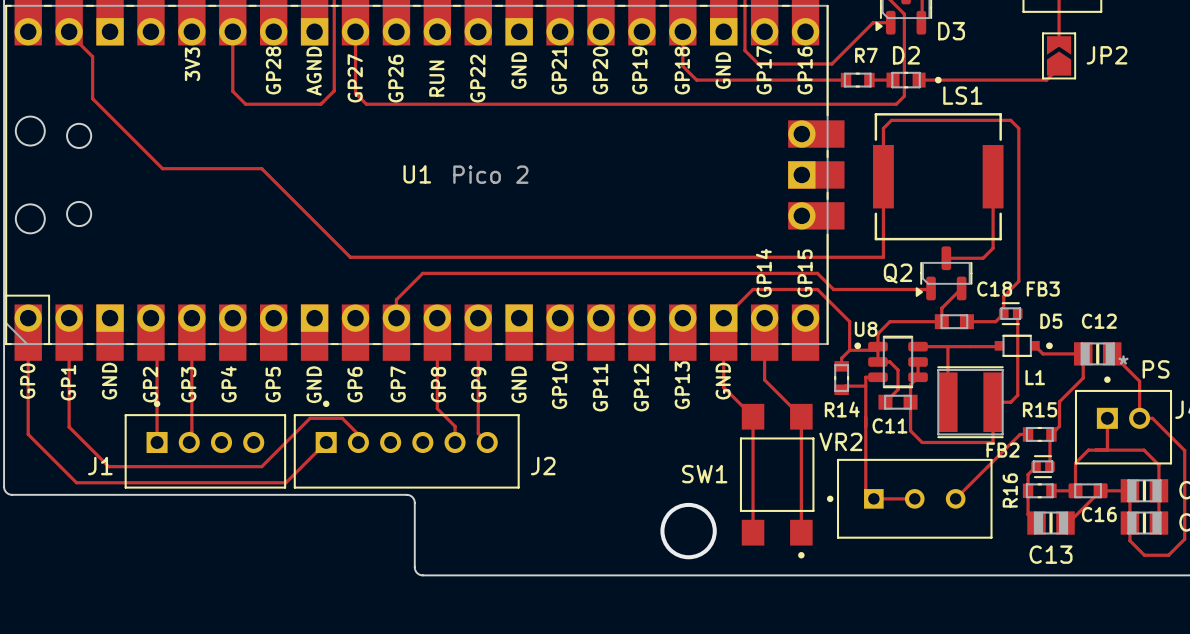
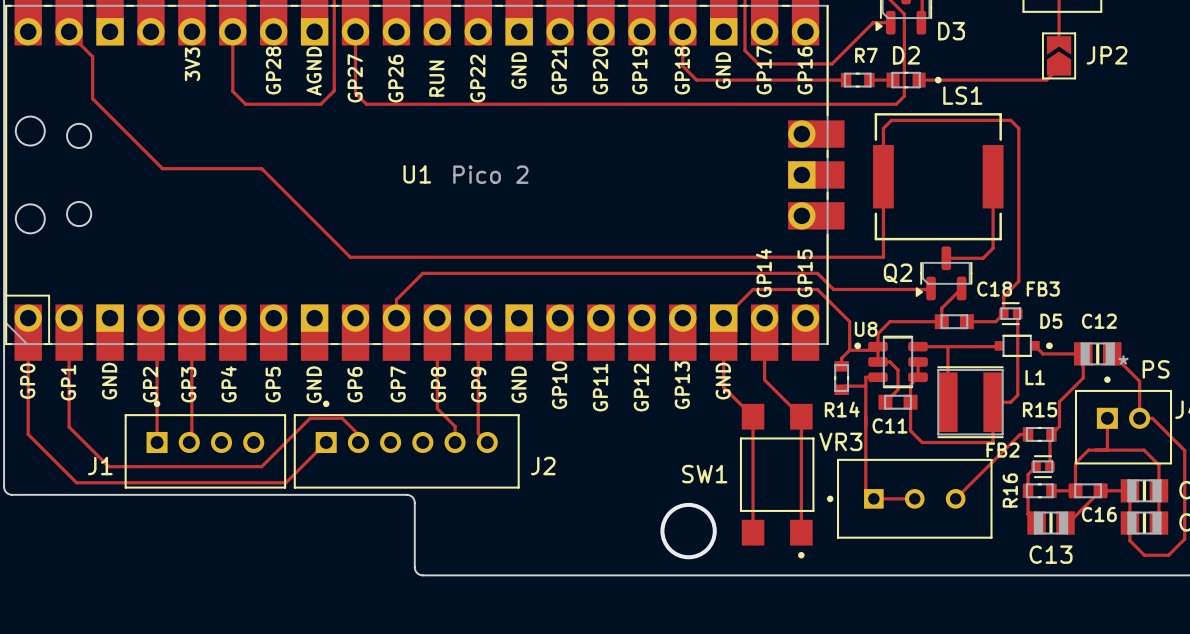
VR2 name: VR2 (840, 441) -> VR3 (840, 441)

